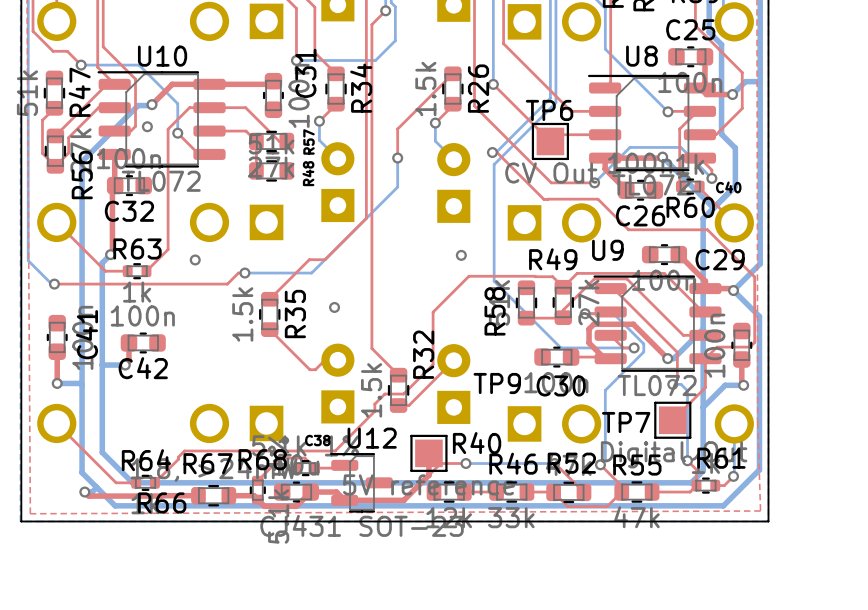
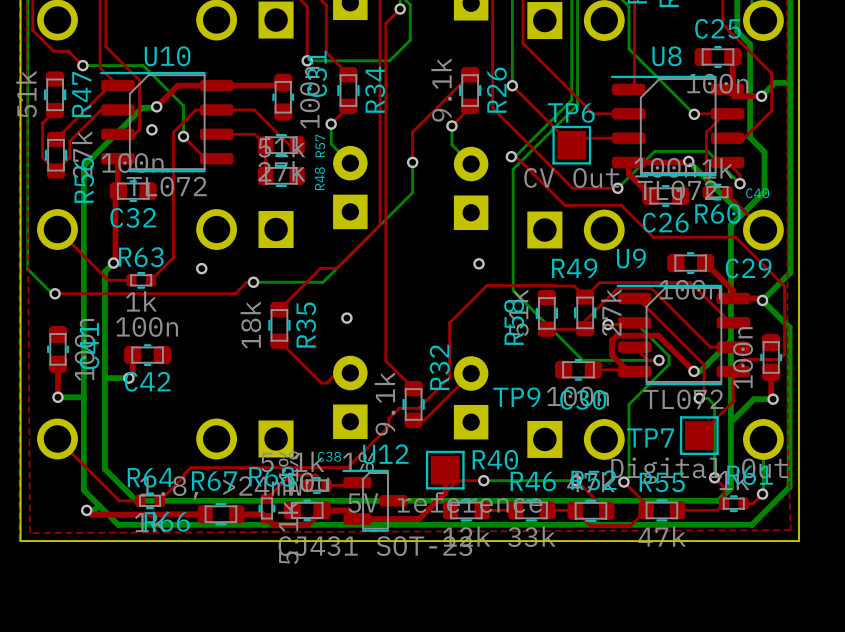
R26 value: 1.5k (425, 89) -> 9.1k (441, 89)
R35 value: 1.5k (242, 314) -> 18k (250, 325)
R32 value: 1.5k (371, 390) -> 9.1k (385, 403)

